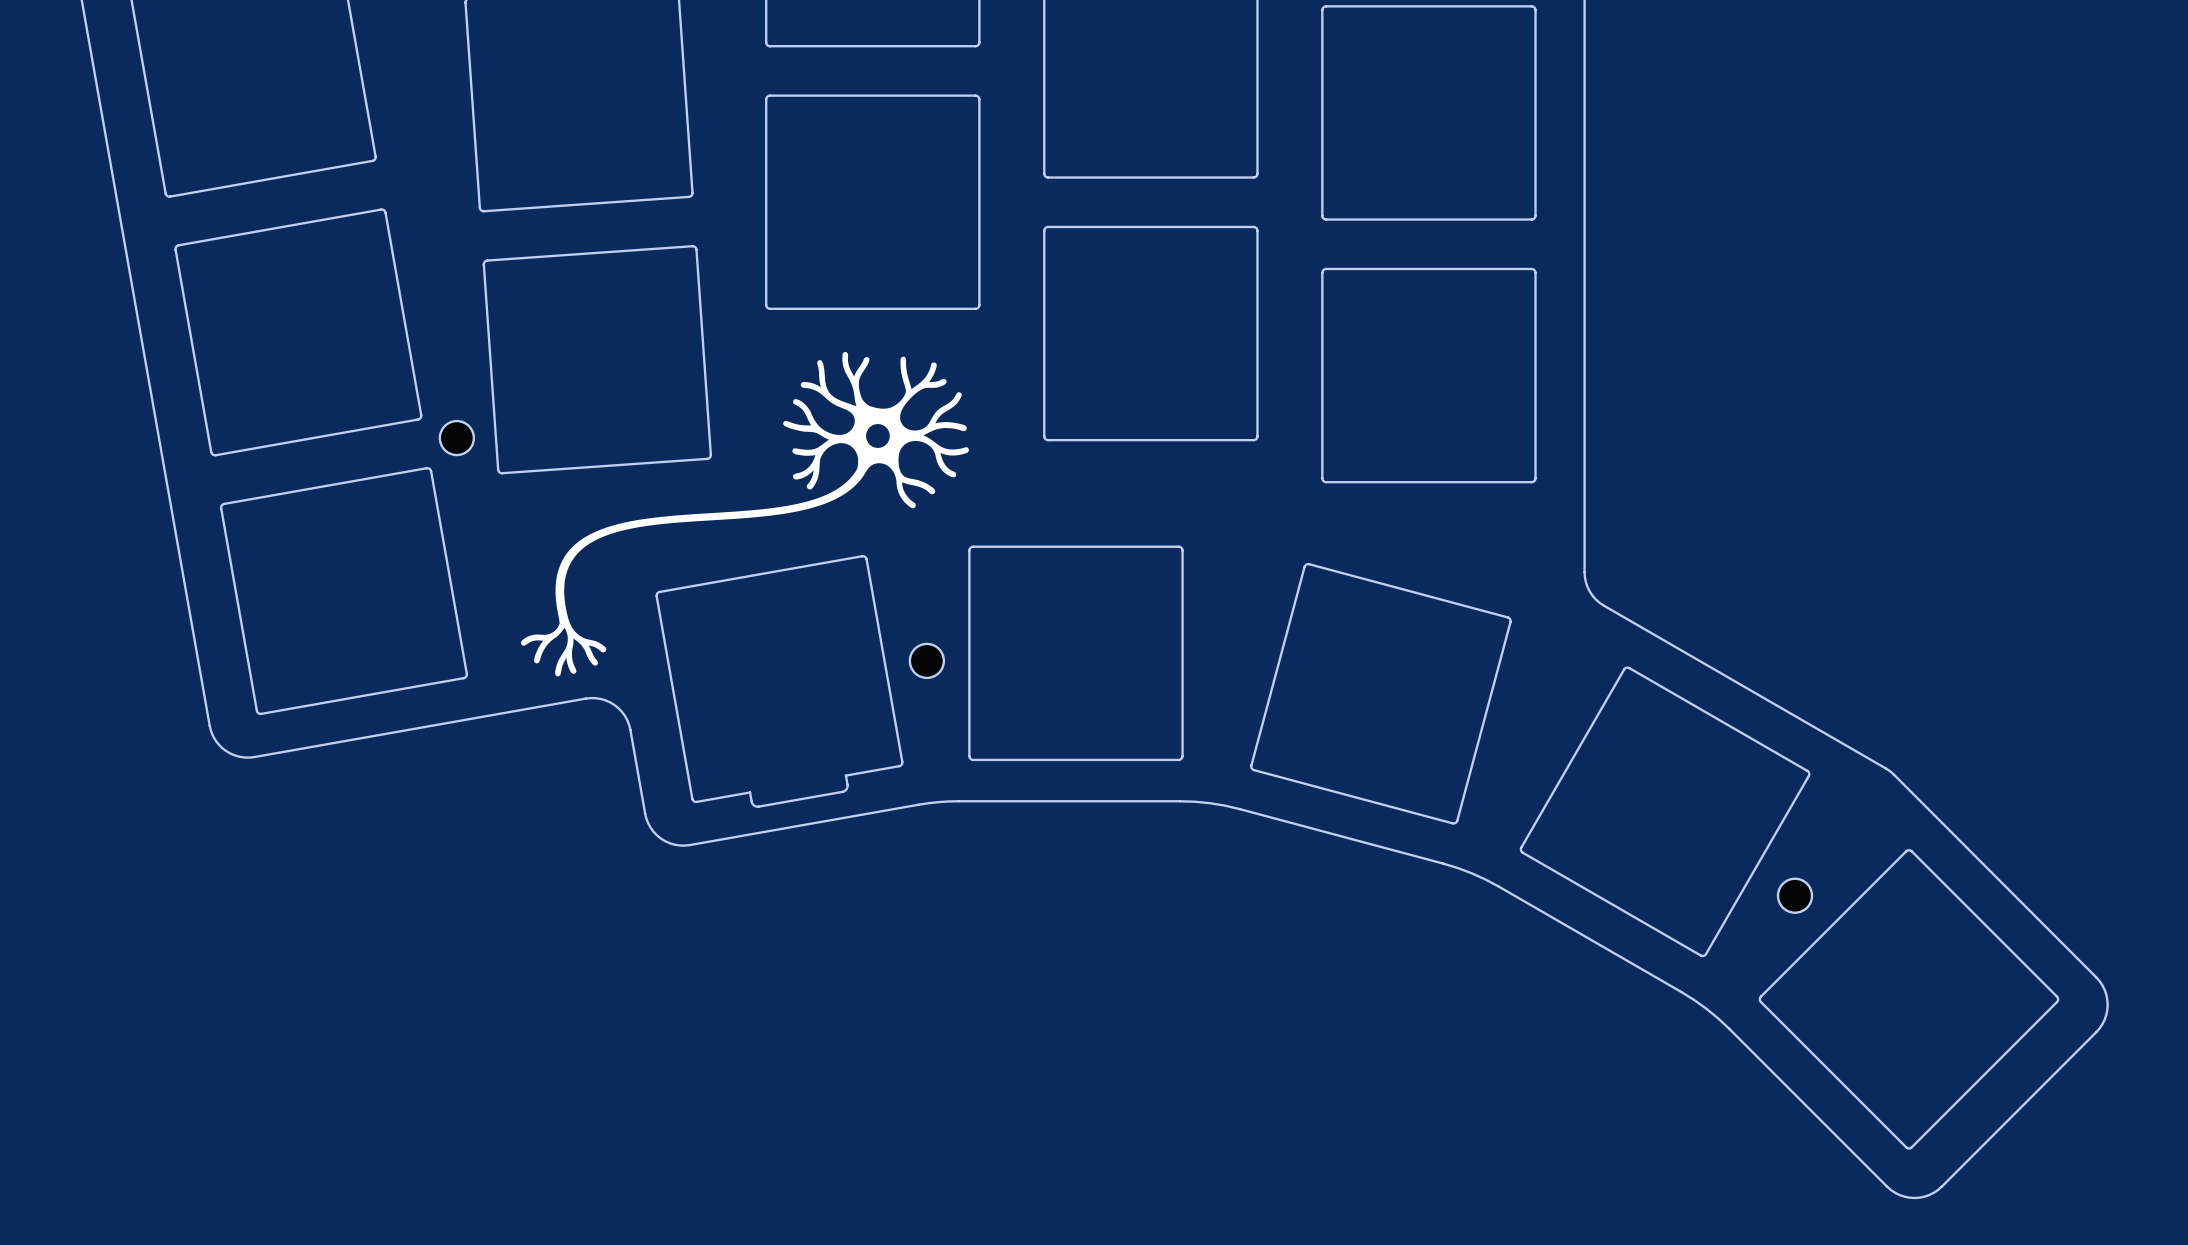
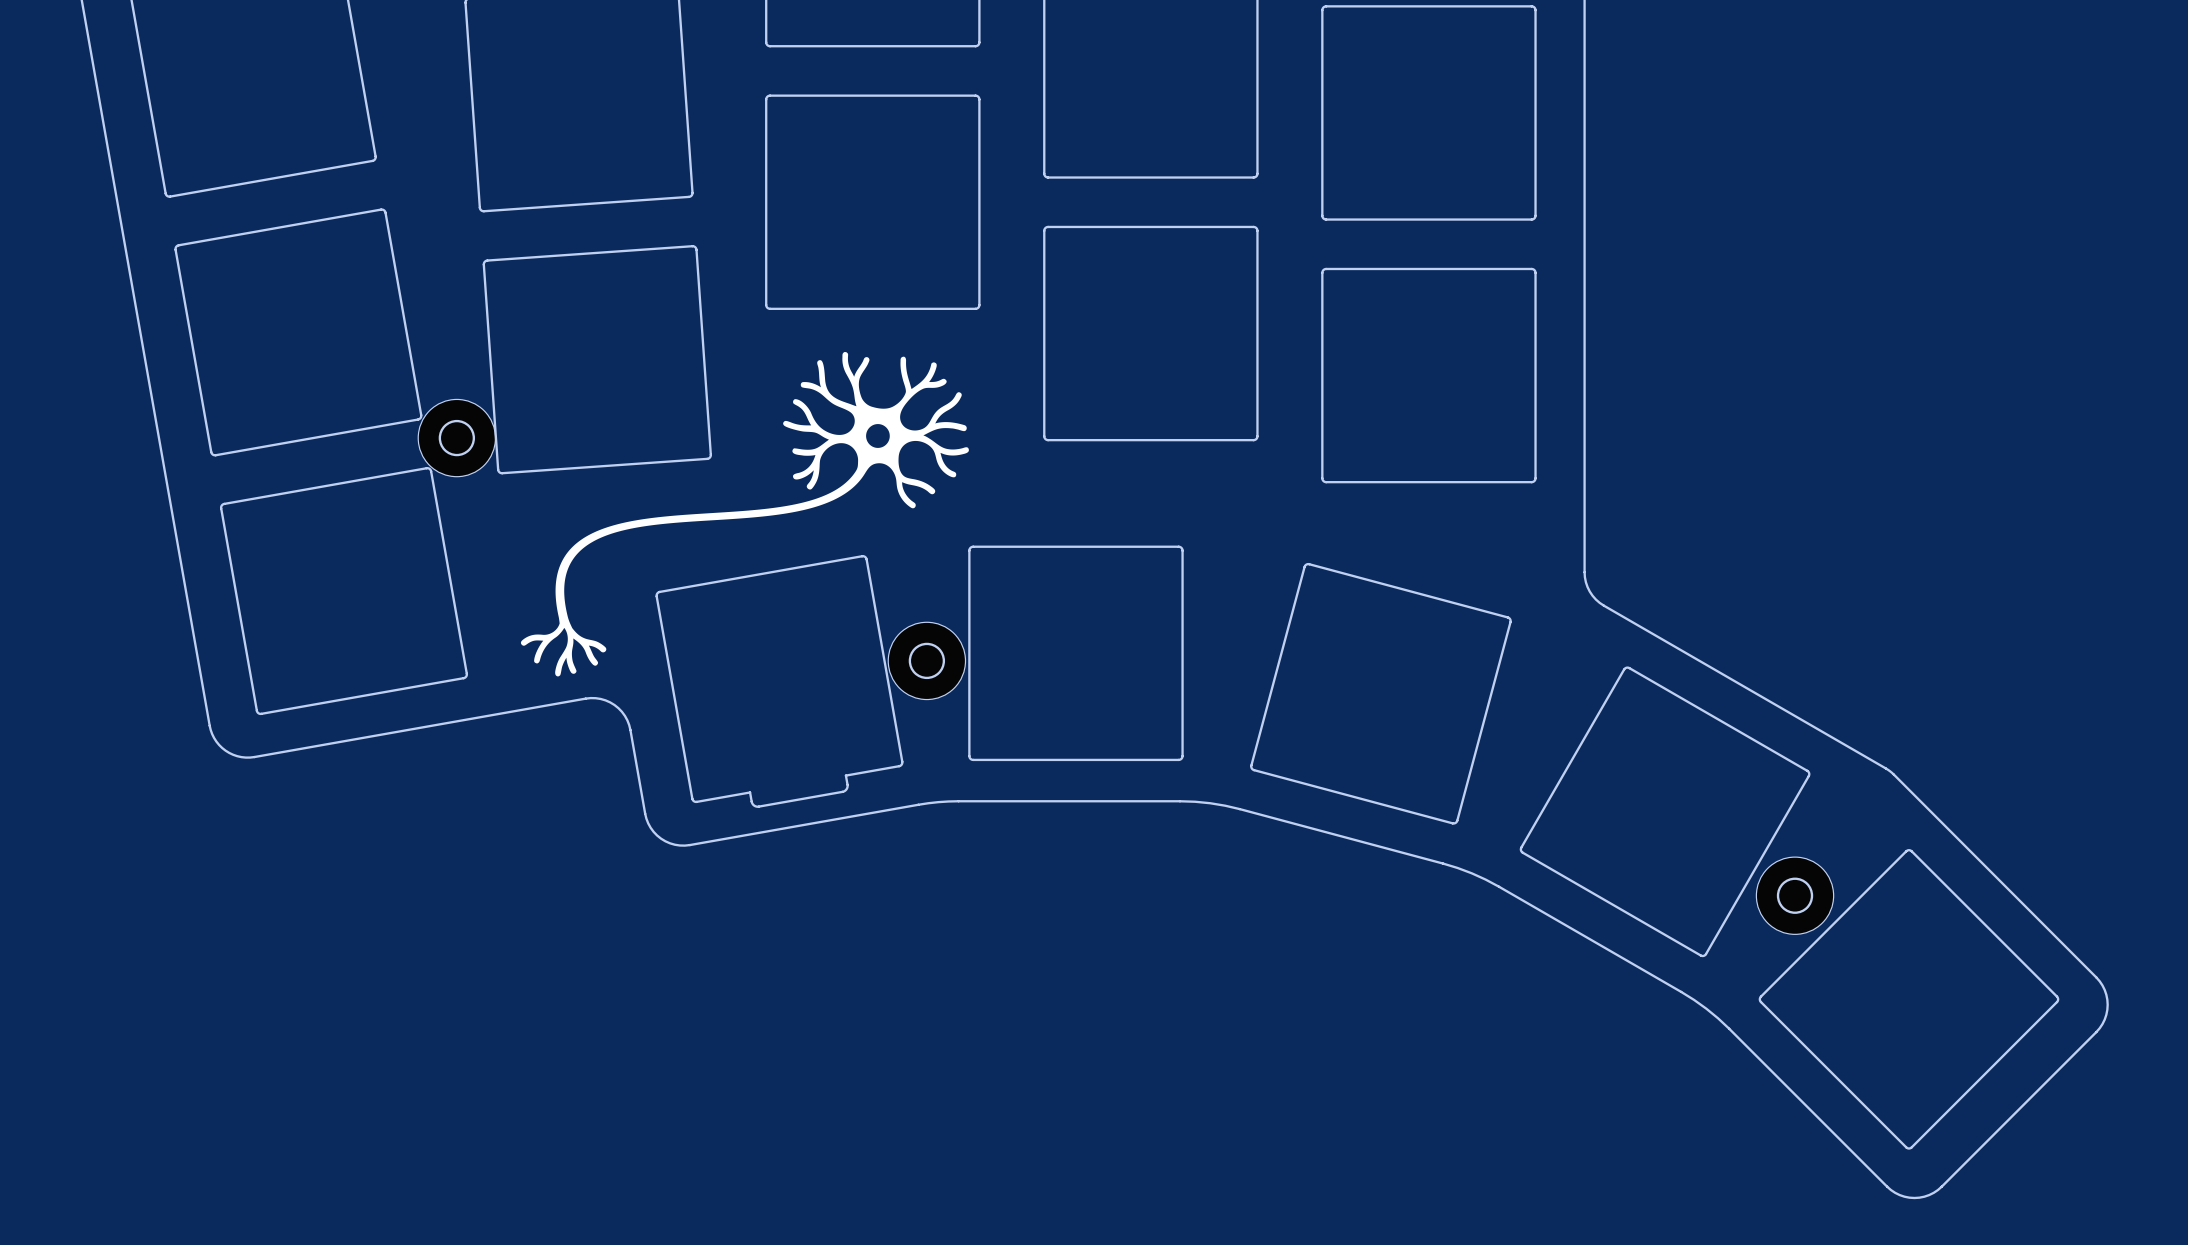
part footprint: [439, 421, 474, 456] -> [418, 399, 496, 477]
part footprint: [909, 643, 944, 678] -> [888, 622, 966, 700]
part footprint: [1778, 878, 1813, 913] -> [1756, 857, 1834, 935]

